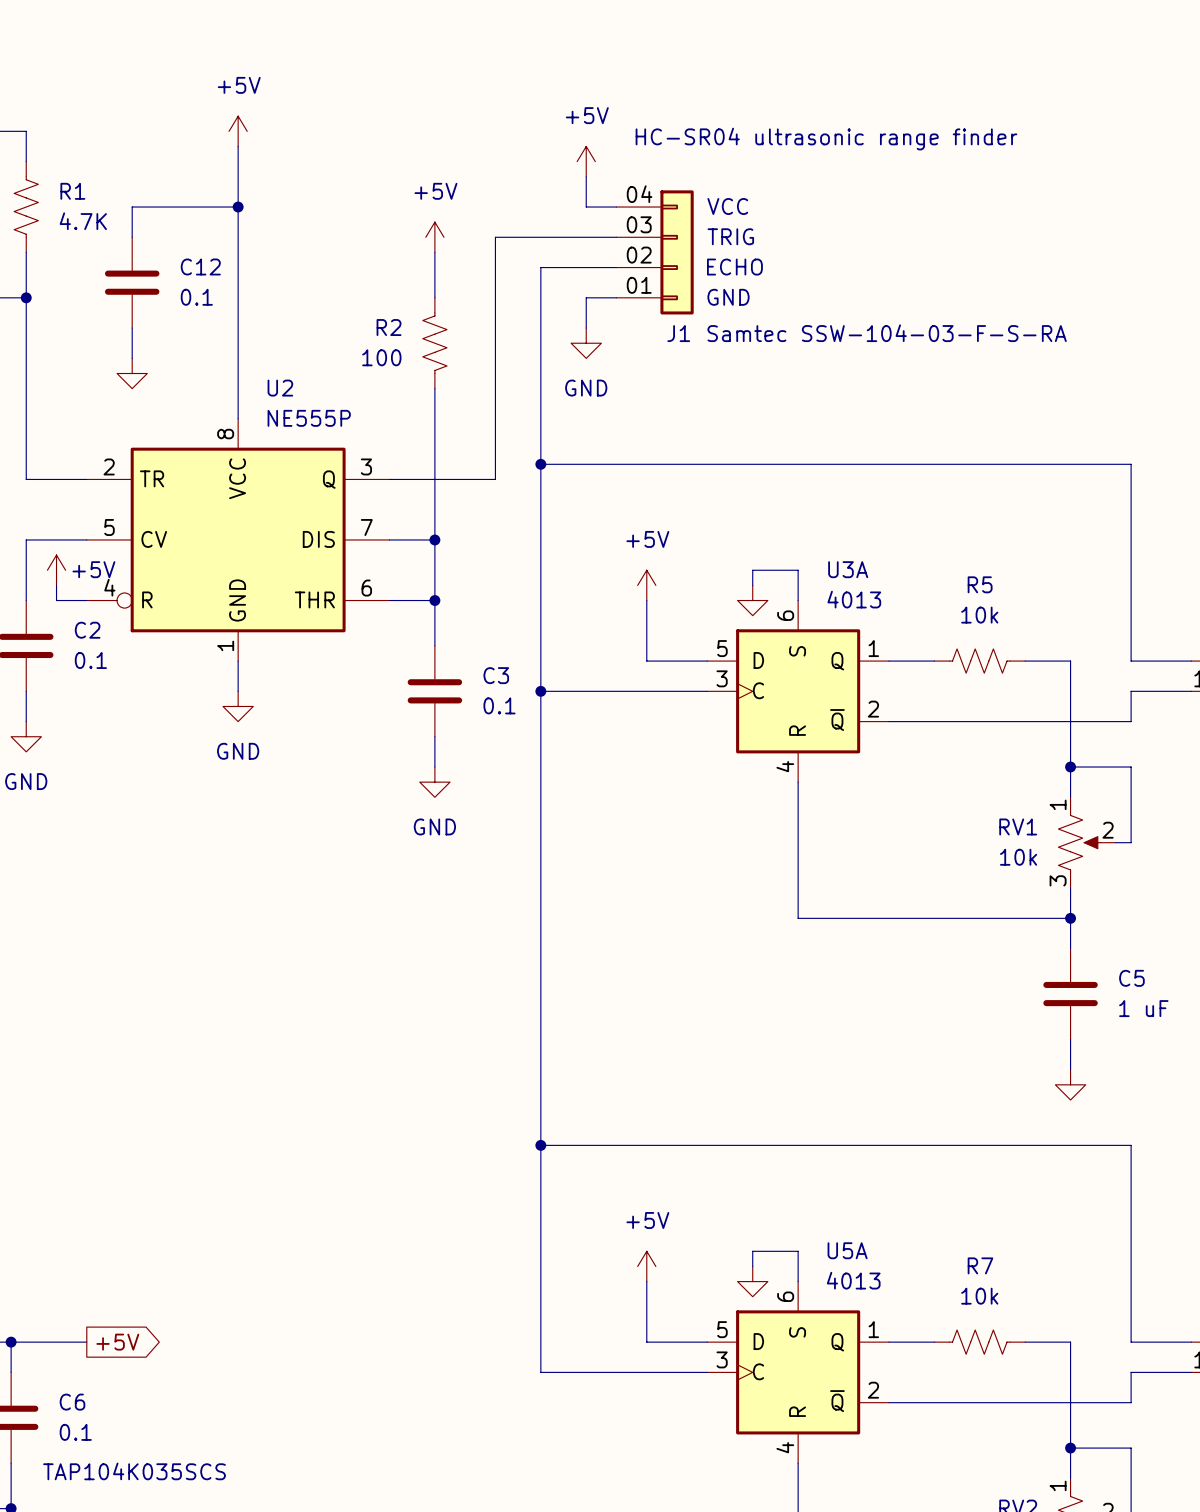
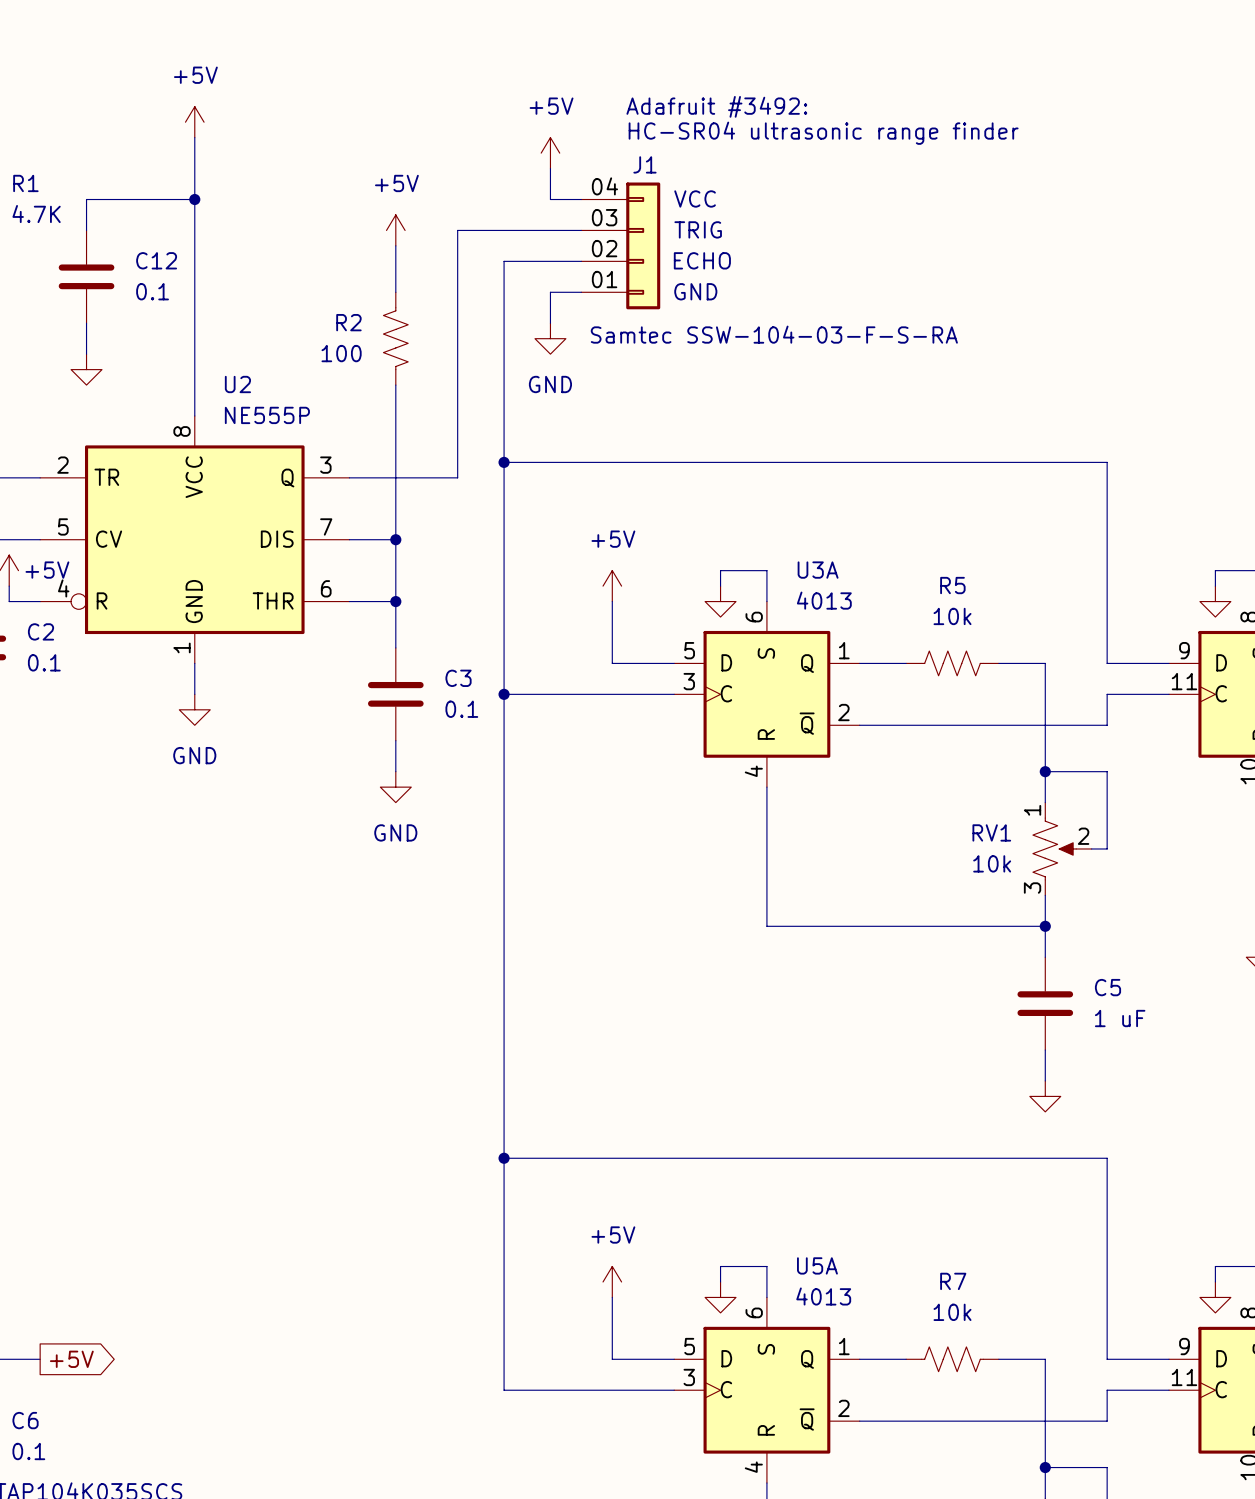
text: none -> Adafruit #3492: (716, 106)
text position: HC-SR04 ultrasonic range finder (826, 139) -> HC-SR04 ultrasonic range finder (823, 133)
J1 name position: J1 (678, 333) -> J1 (644, 164)
J1 value position: Samtec SSW-104-03-F-S-RA (887, 333) -> Samtec SSW-104-03-F-S-RA (774, 334)

